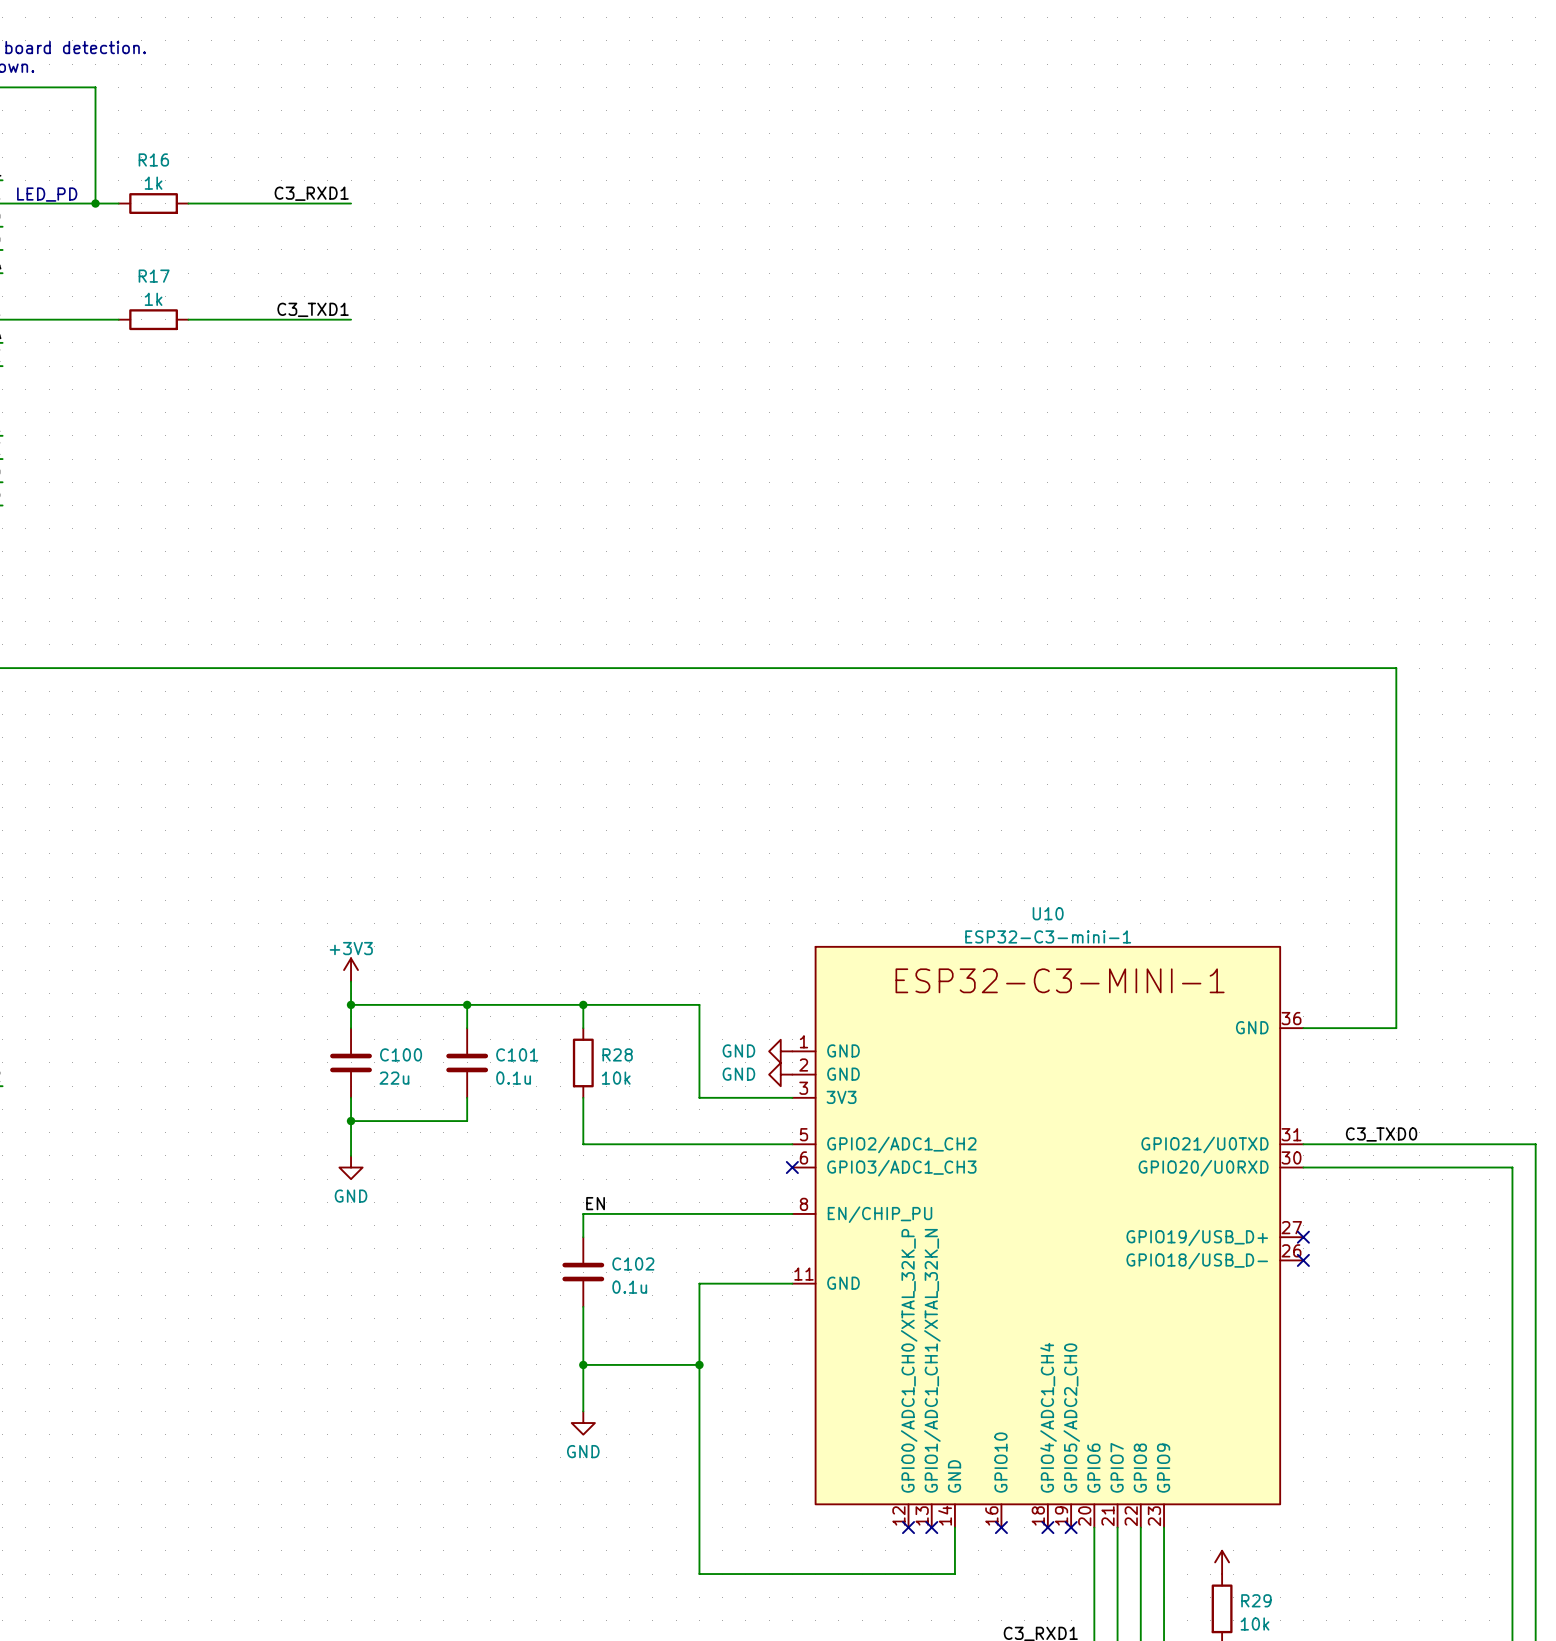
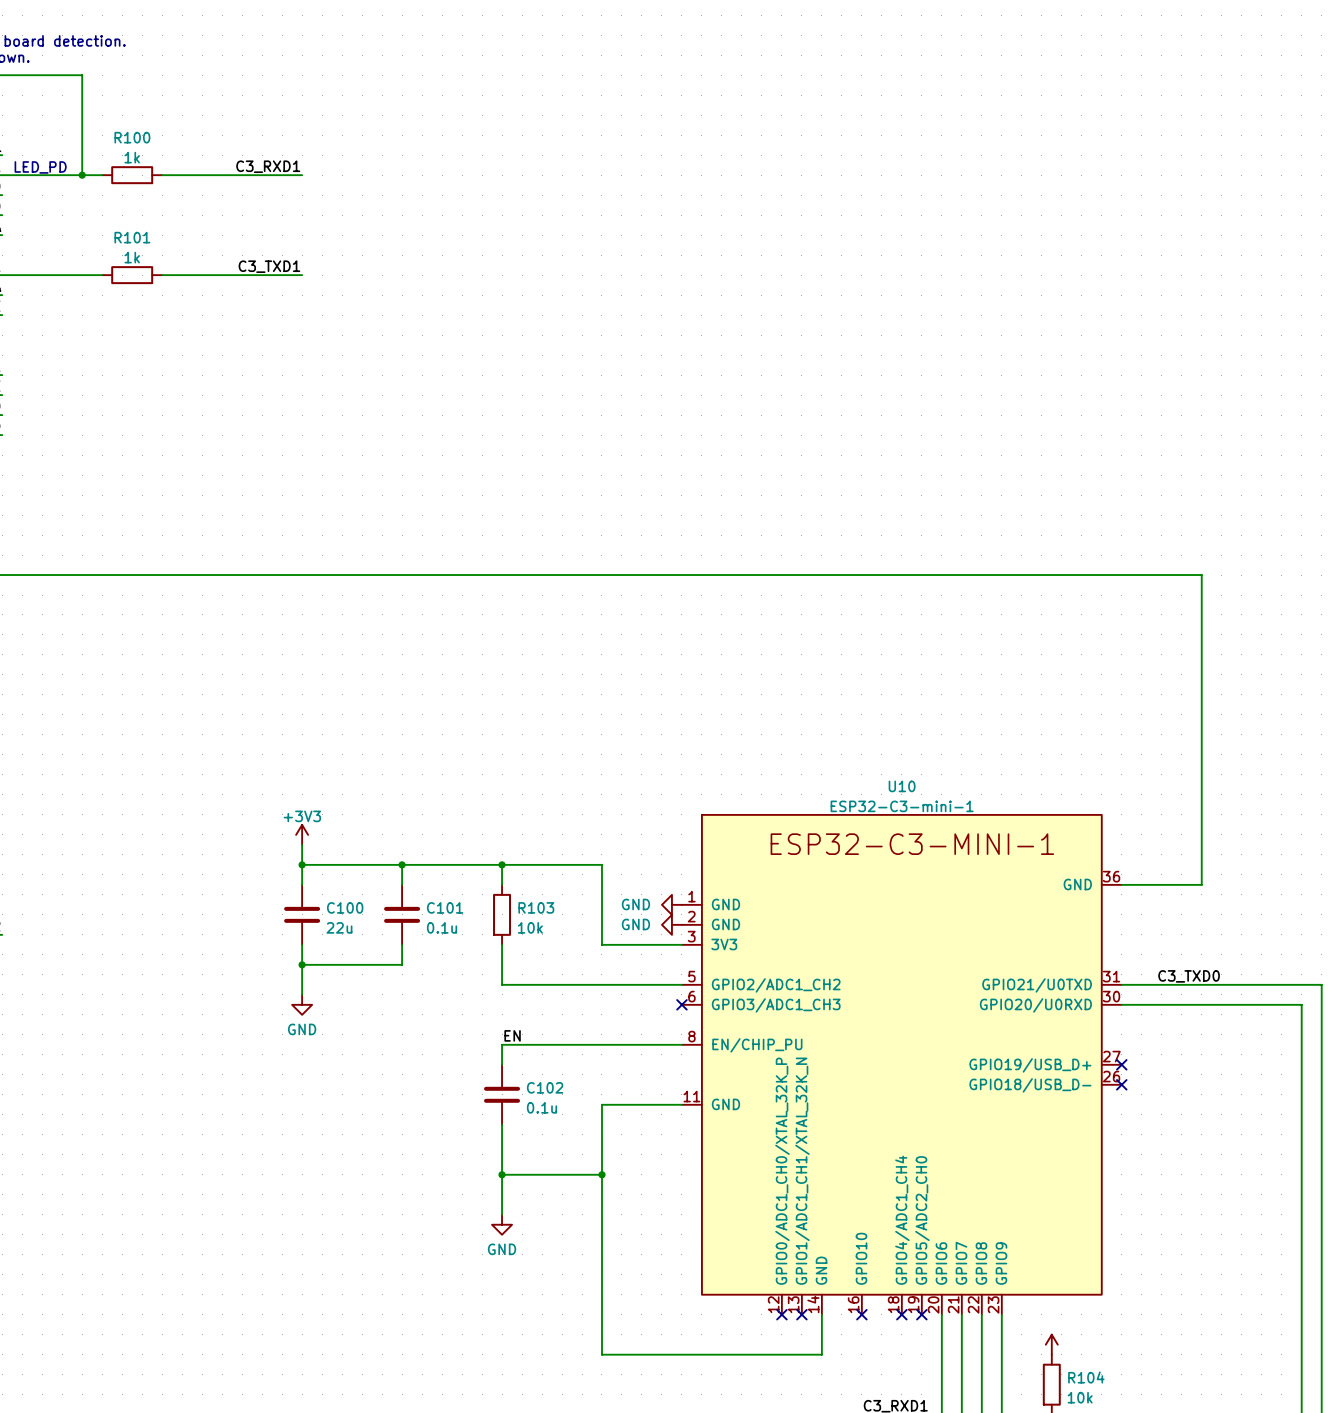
R16 name: R16 (153, 159) -> R100 (132, 137)
R17 name: R17 (154, 276) -> R101 (132, 237)
R28 name: R28 (617, 1054) -> R103 (536, 907)
R29 name: R29 (1256, 1600) -> R104 (1086, 1377)

